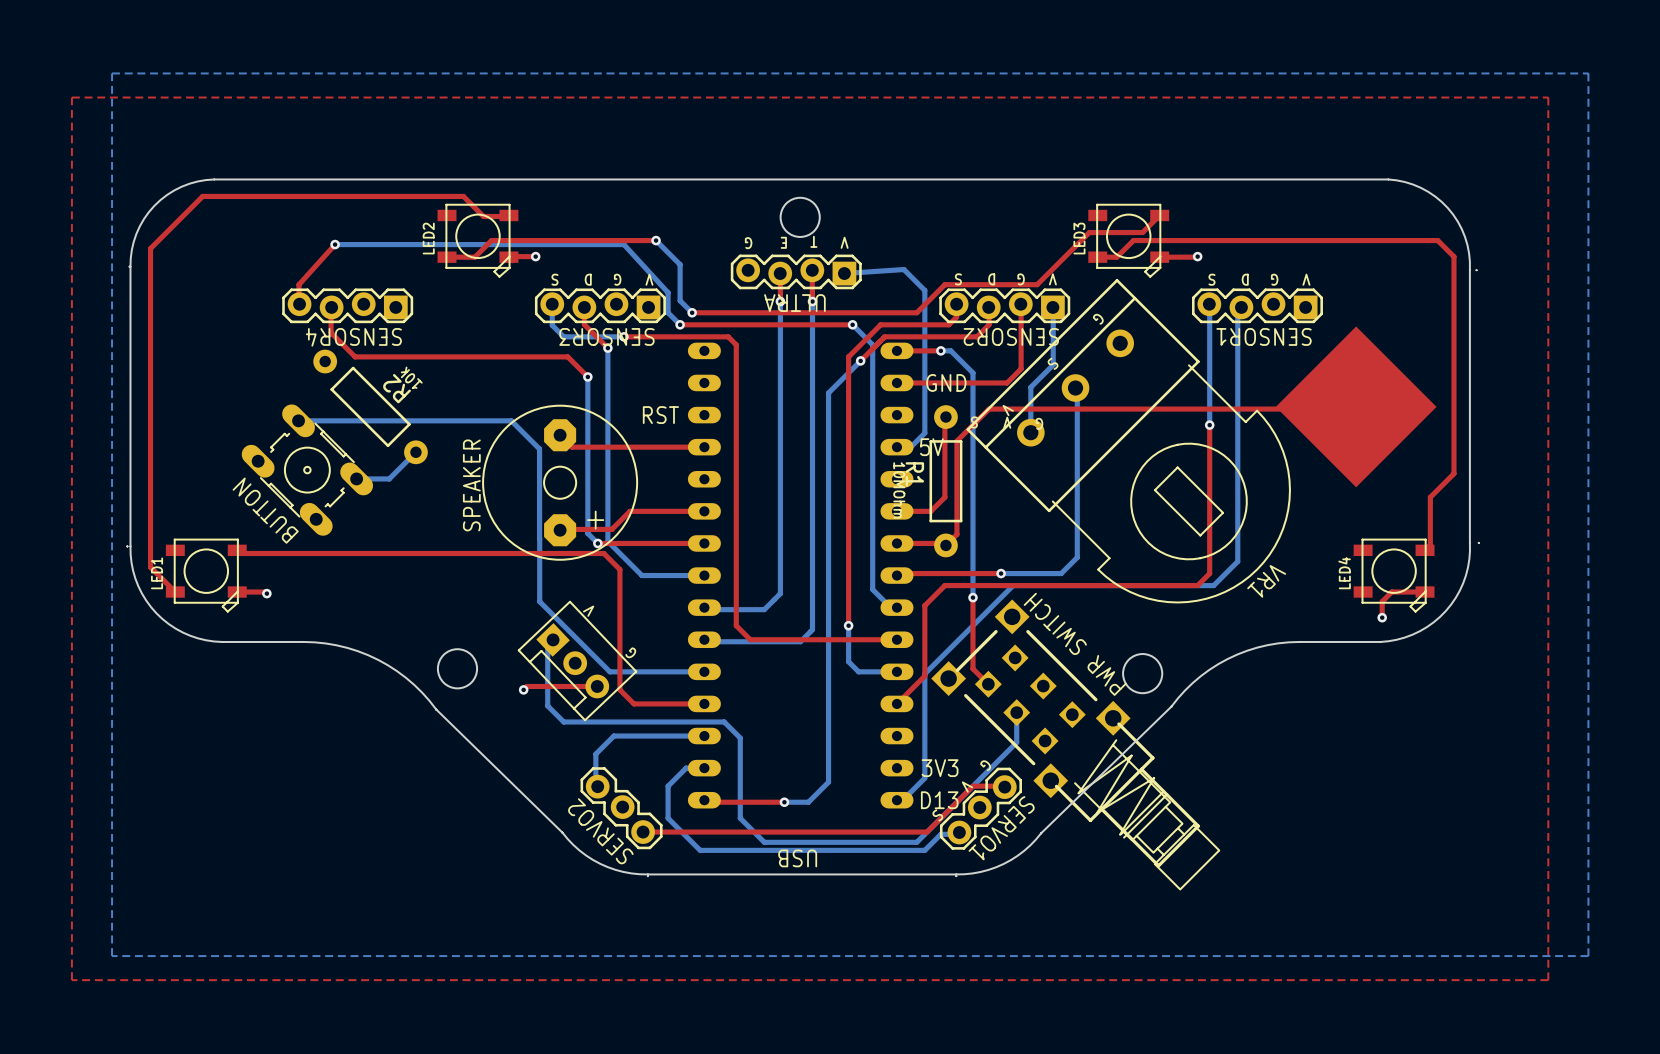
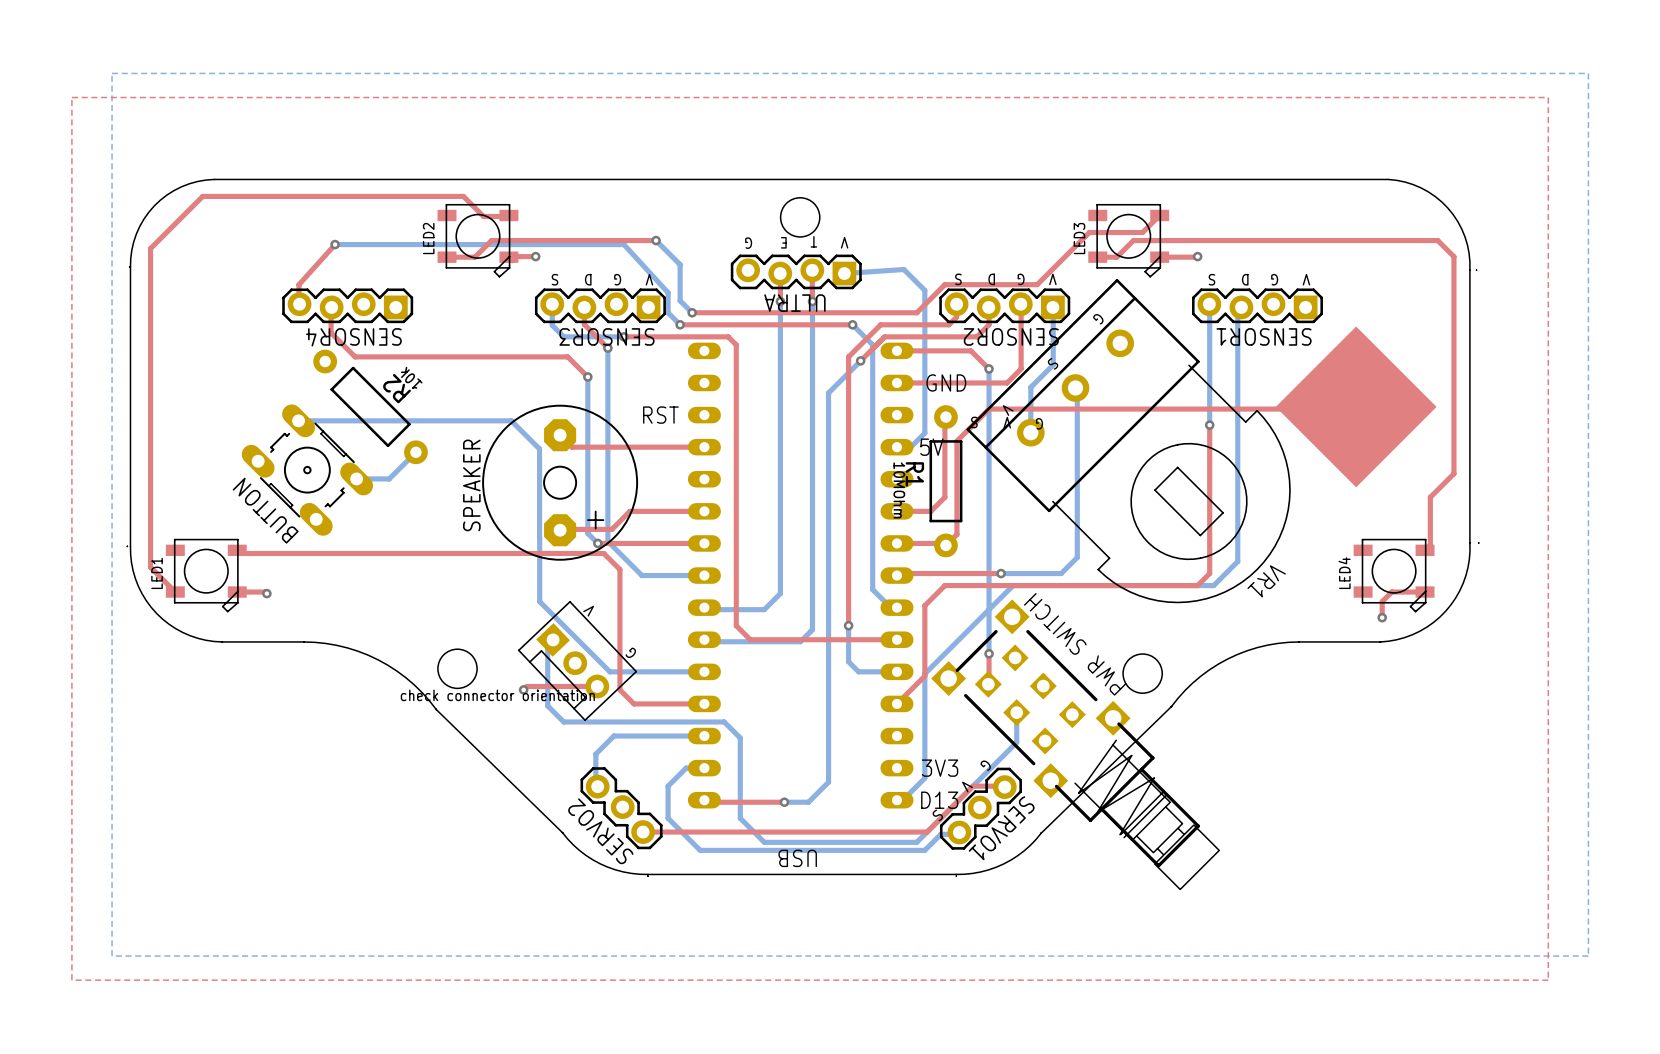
bottom track: (940, 350) (950, 350) (972, 372) (972, 597) -> none
top track: none -> (940, 350) (970, 350) (989, 368)
via position: (940, 350) -> (989, 368)
bottom track: none -> (989, 368) (989, 653)
top track: (972, 597) (972, 668) (988, 684) -> (989, 653) (988, 684)
via position: (972, 597) -> (989, 653)
text: none -> check connector orientation (497, 695)

